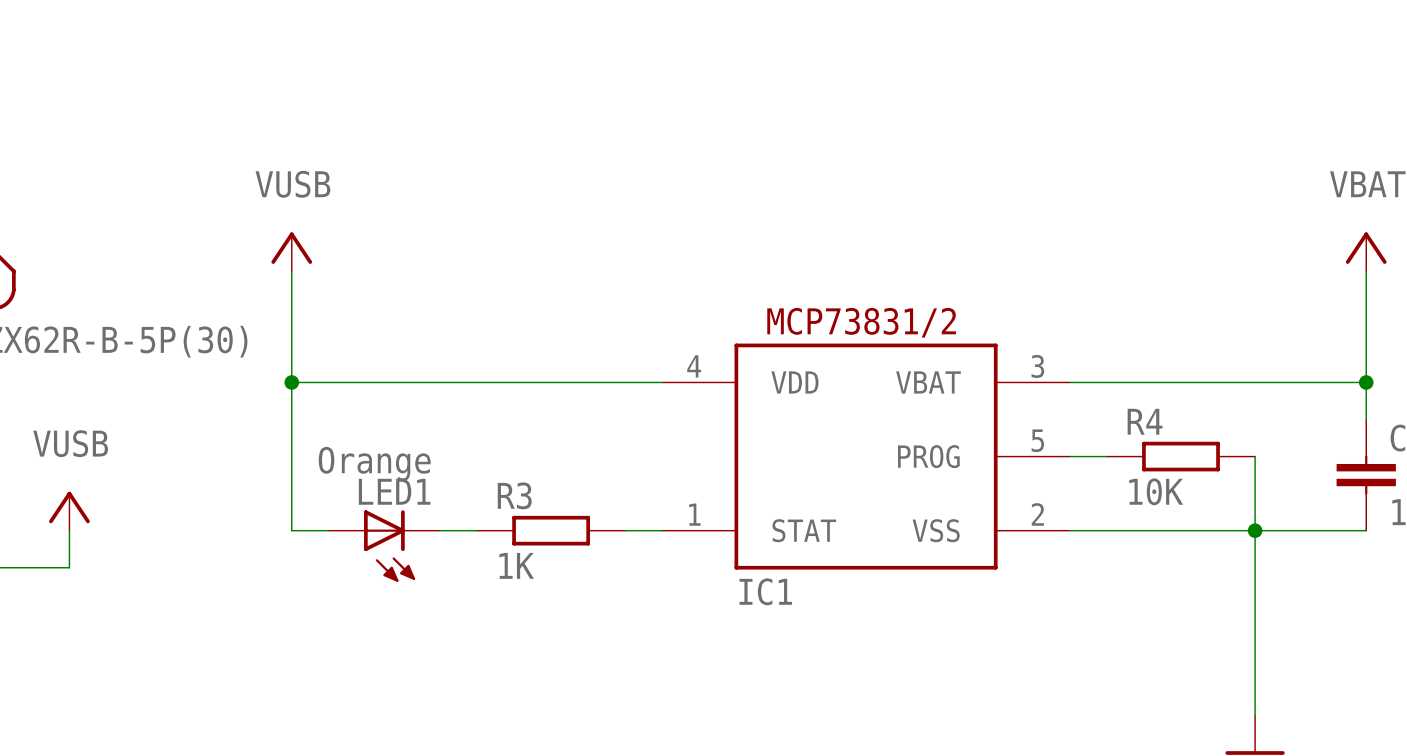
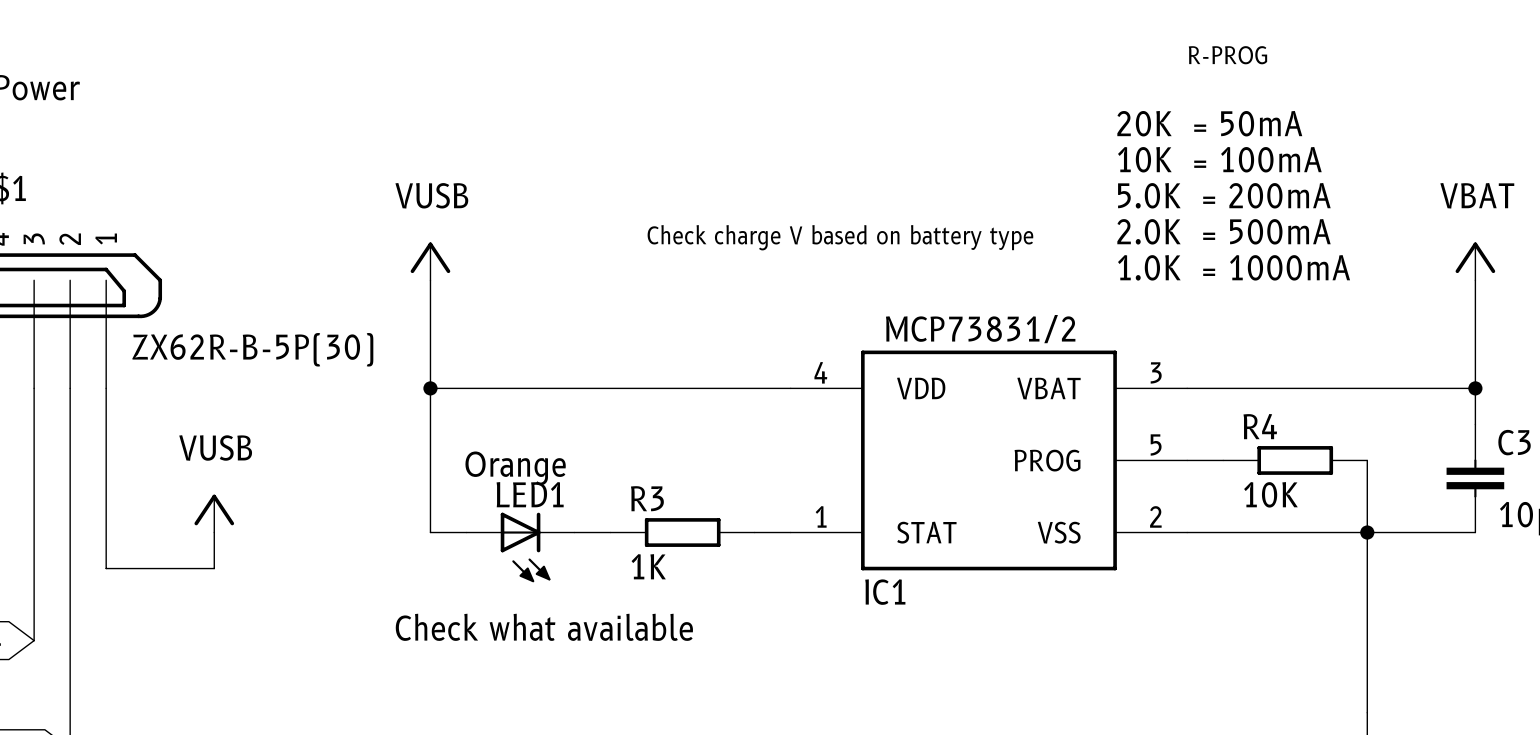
text: none -> R-PROG (1227, 55)
text: none -> 20K = 50mA (1209, 123)
text: none -> 10K = 100mA (1219, 159)
text: none -> 5.0K = 200mA (1224, 195)
text: none -> 2.0K = 500mA (1223, 231)
text: none -> Check charge V based on battery type (840, 237)
text: none -> 1.0K = 1000mA (1234, 267)
text: none -> Check what available (544, 627)

